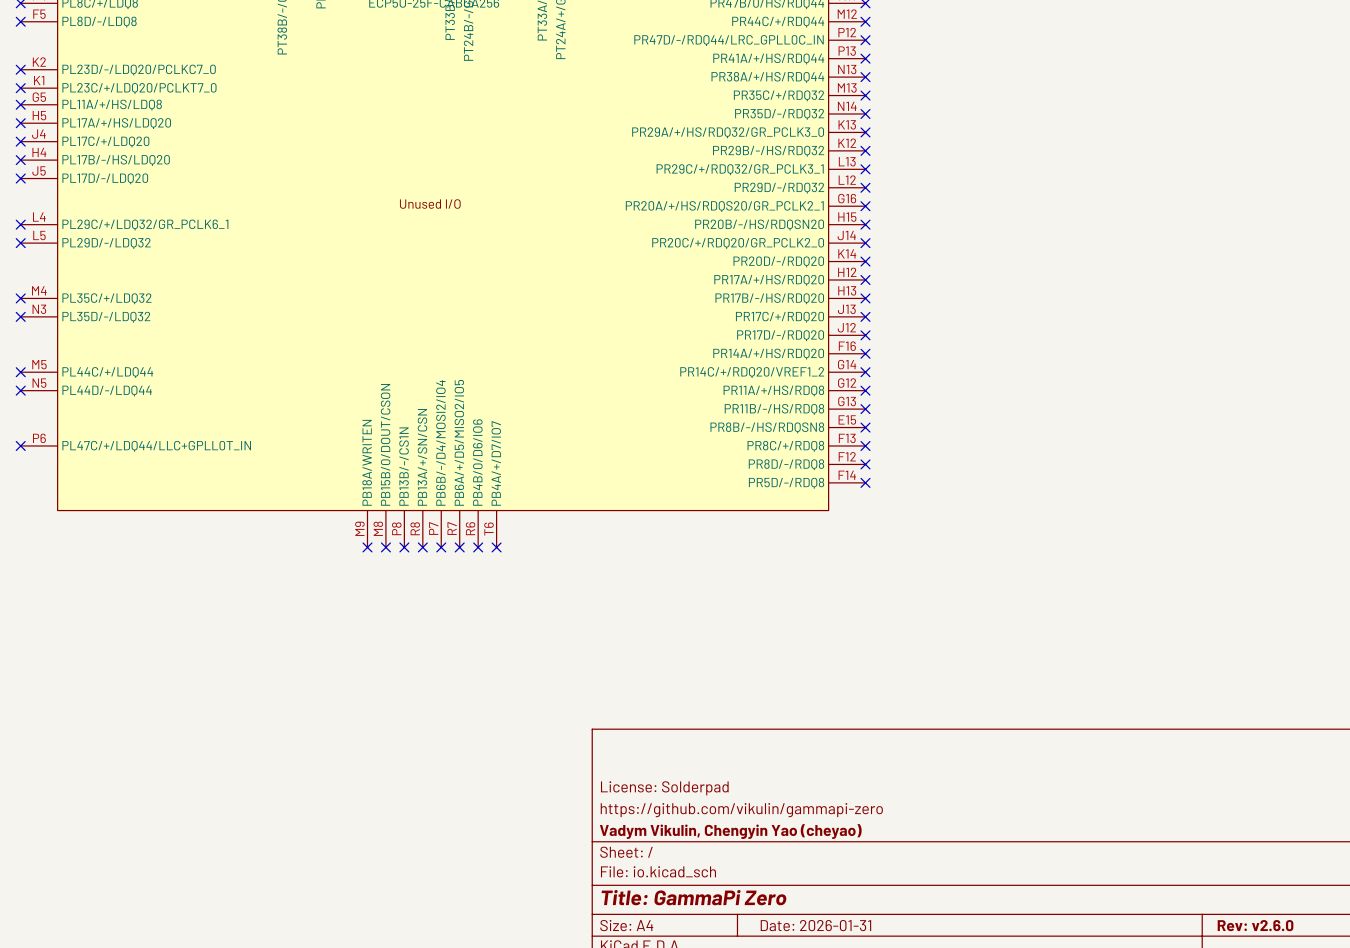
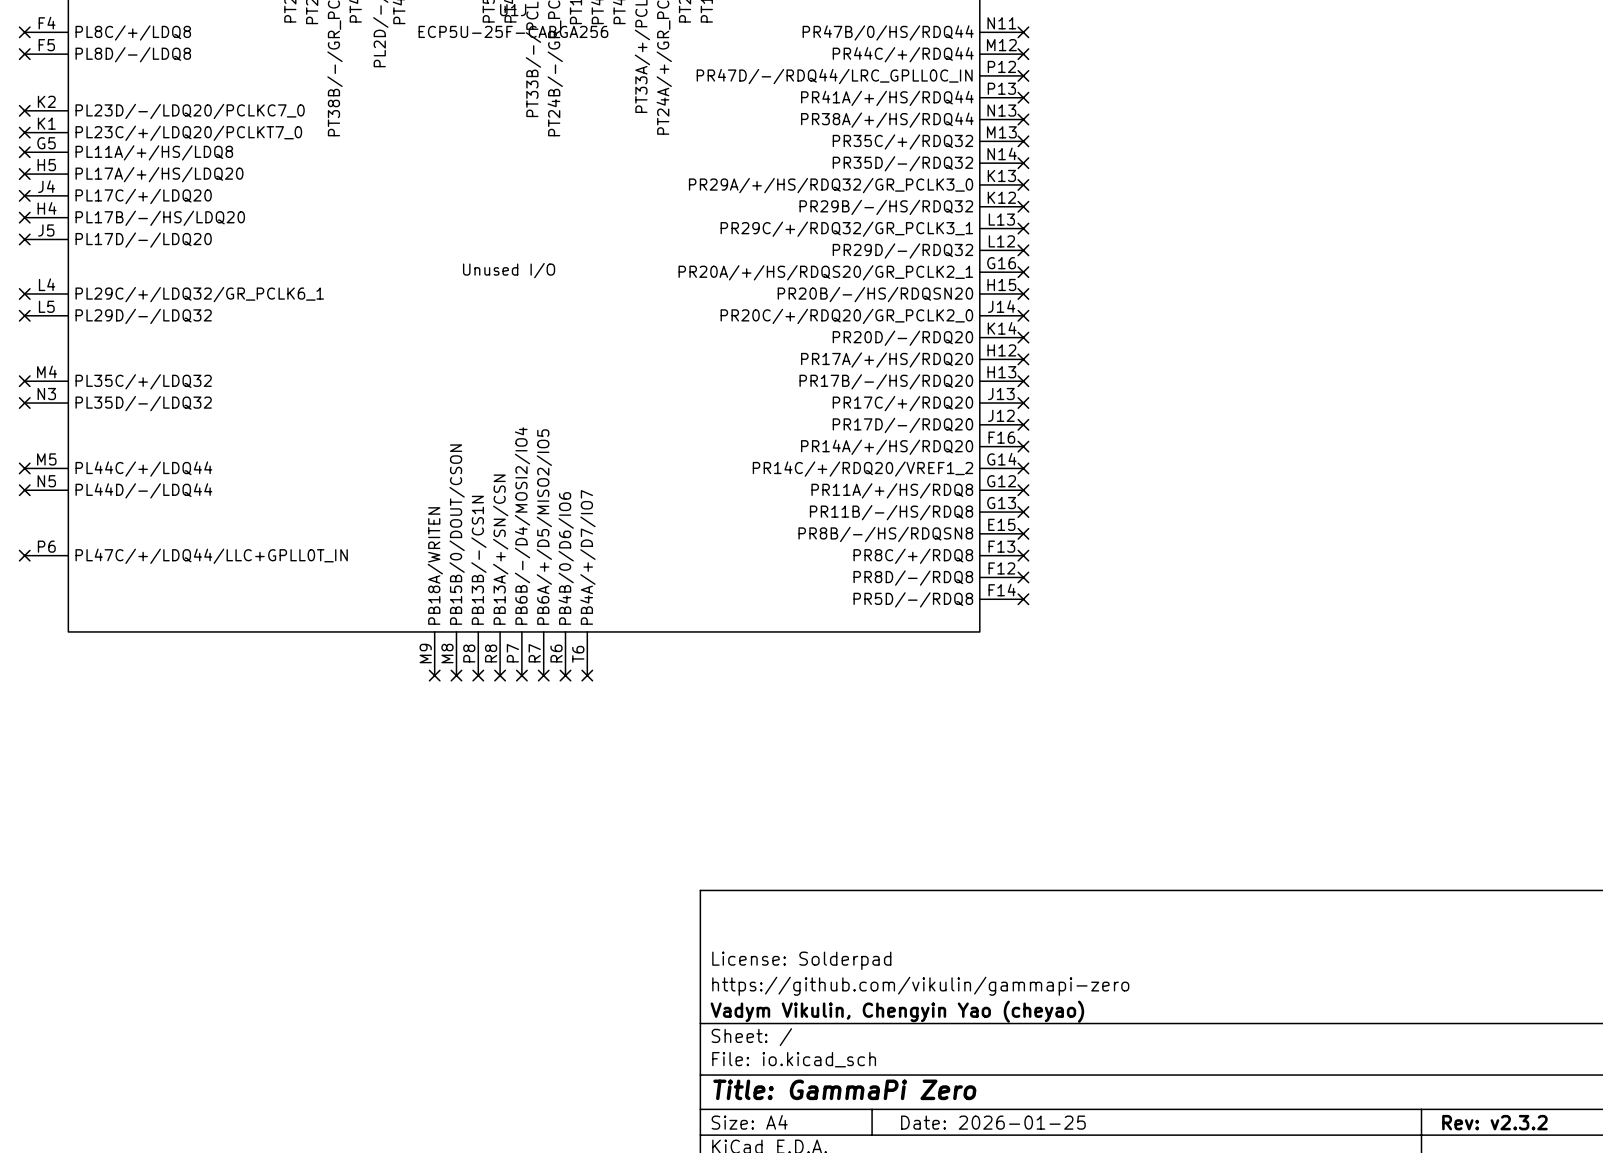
title block: Date: 2026-01-31 (815, 925) -> Date: 2026-01-25 (993, 1122)
title block: Rev: v2.6.0 (1255, 925) -> Rev: v2.3.2 (1494, 1122)

